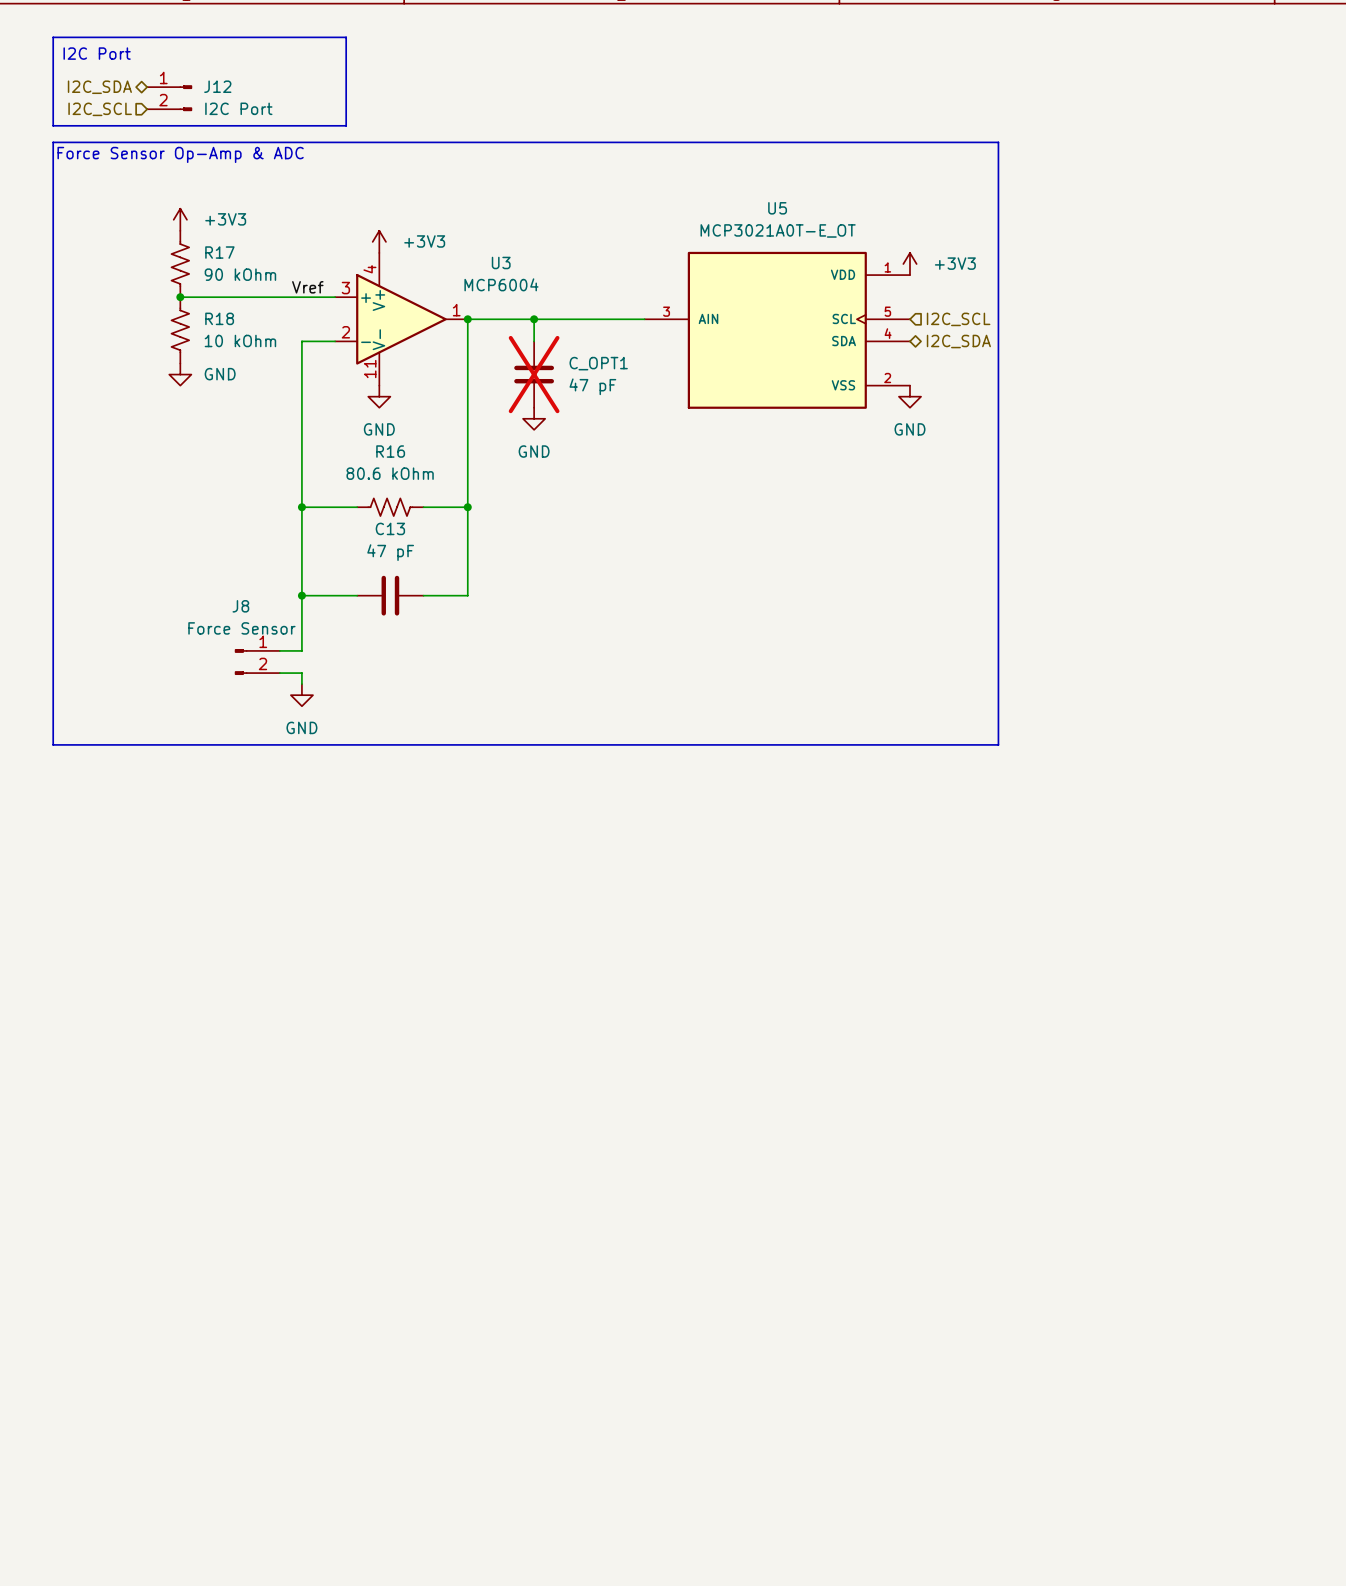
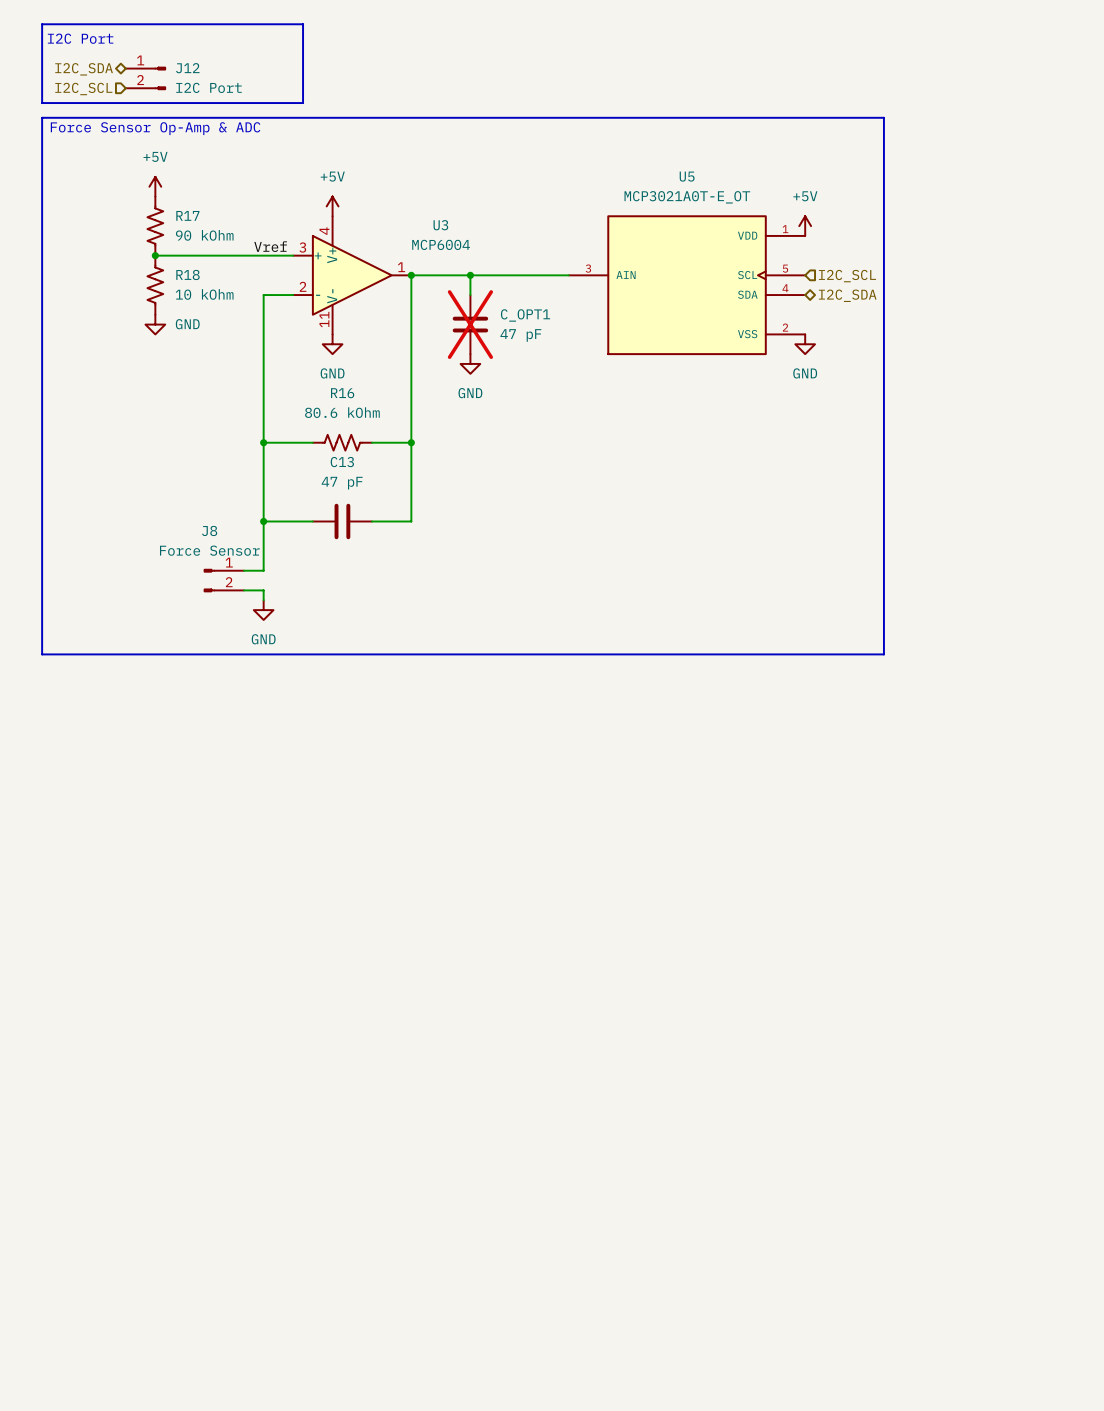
power symbol: +3V3 (180, 219) -> +5V (155, 186)
power symbol: +3V3 (379, 241) -> +5V (332, 206)
power symbol: +3V3 (909, 264) -> +5V (805, 226)

